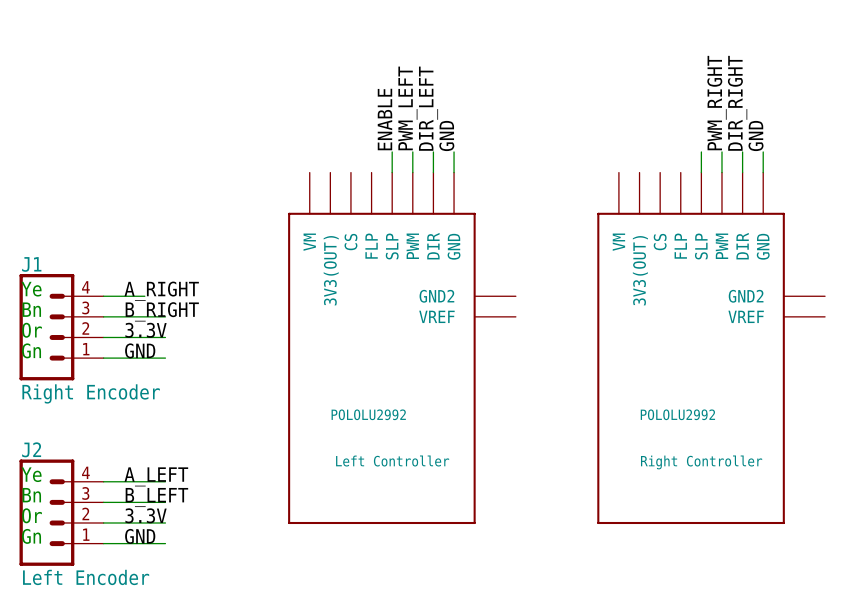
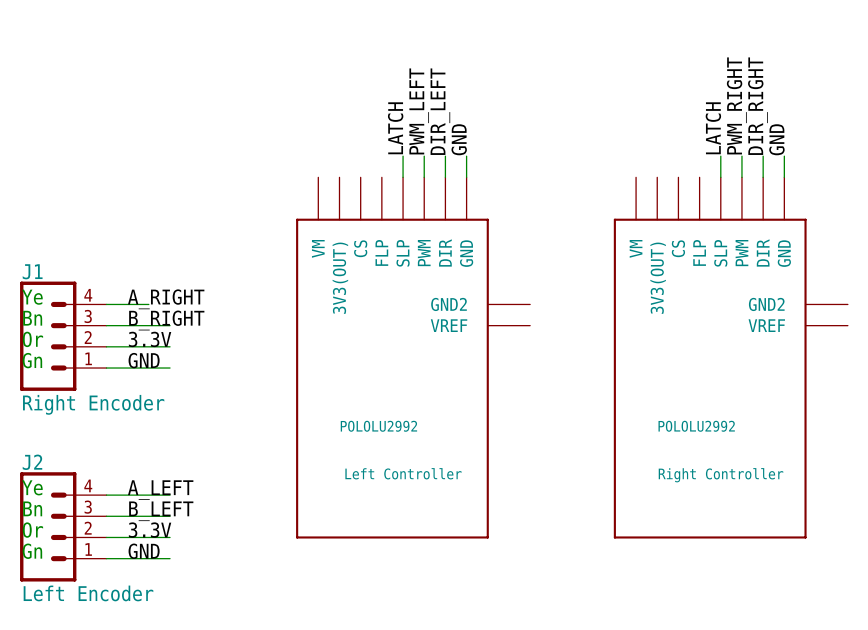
label: ENABLE (384, 119) -> LATCH (395, 128)
label: none -> LATCH (713, 128)

